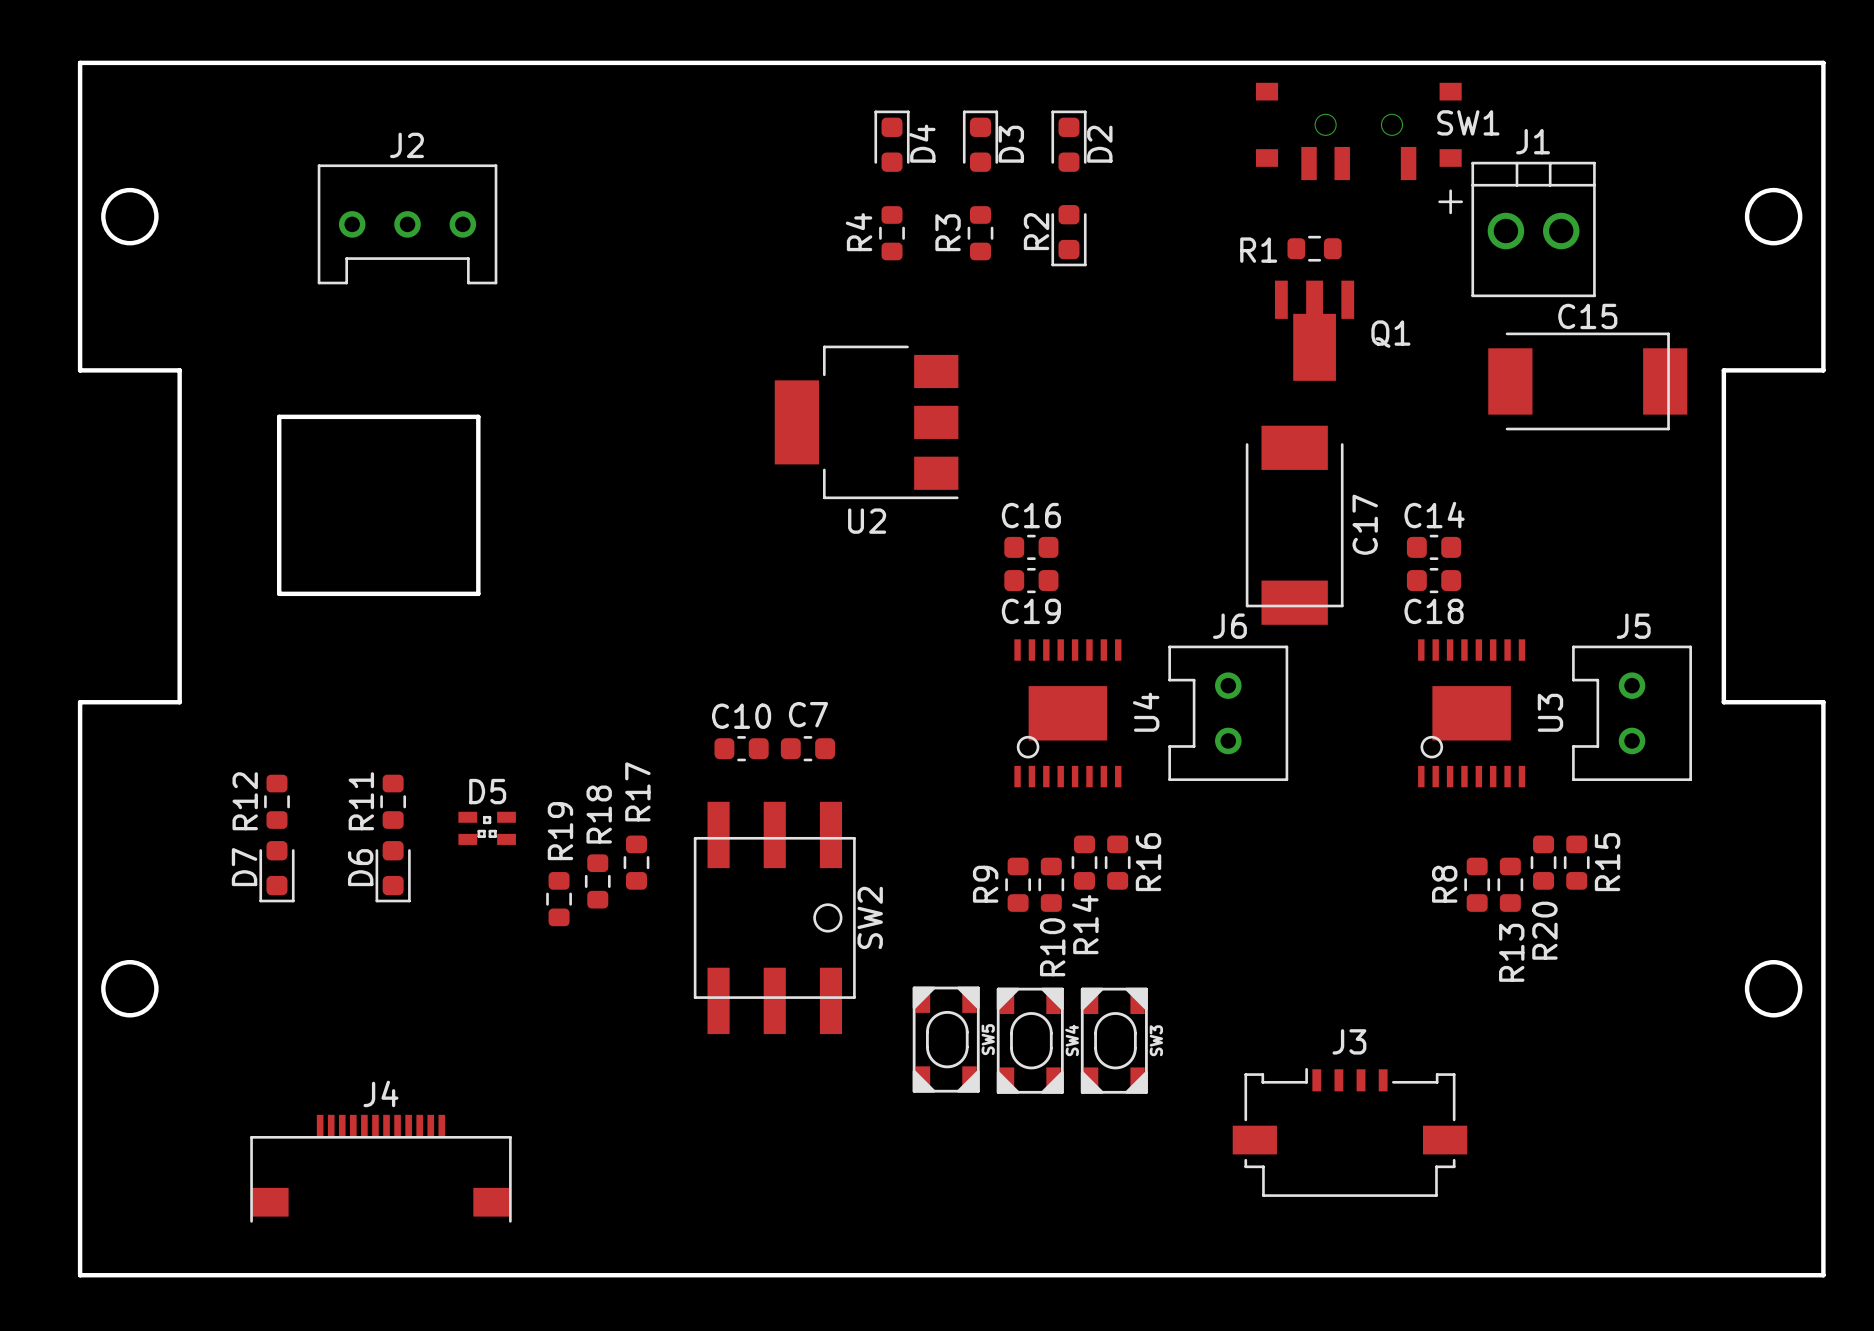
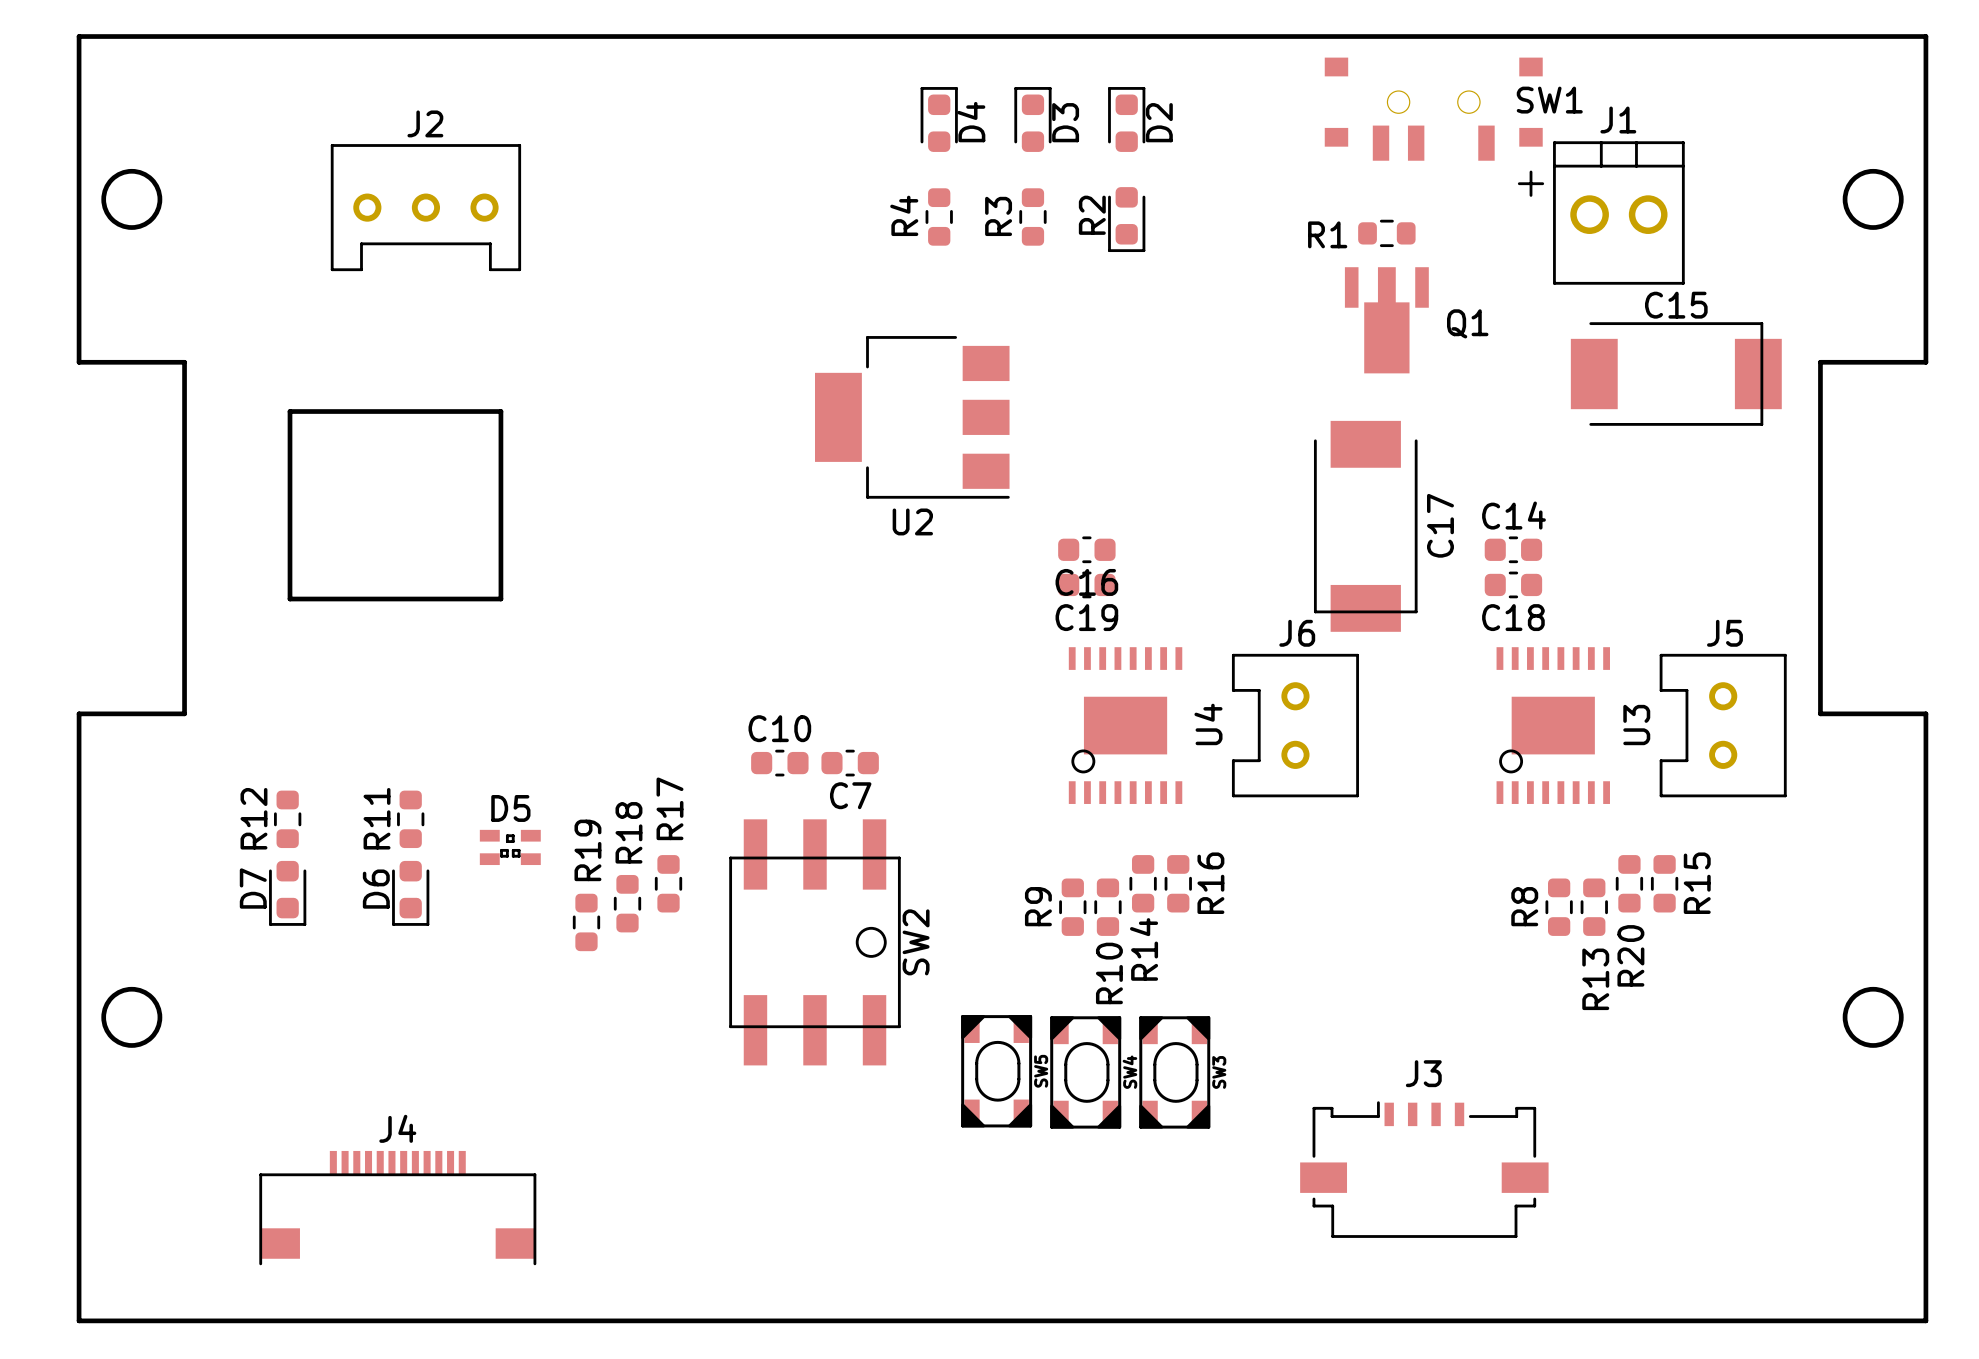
C16 name position: C16 (1031, 515) -> C16 (1086, 582)
C7 name position: C7 (808, 714) -> C7 (850, 795)

